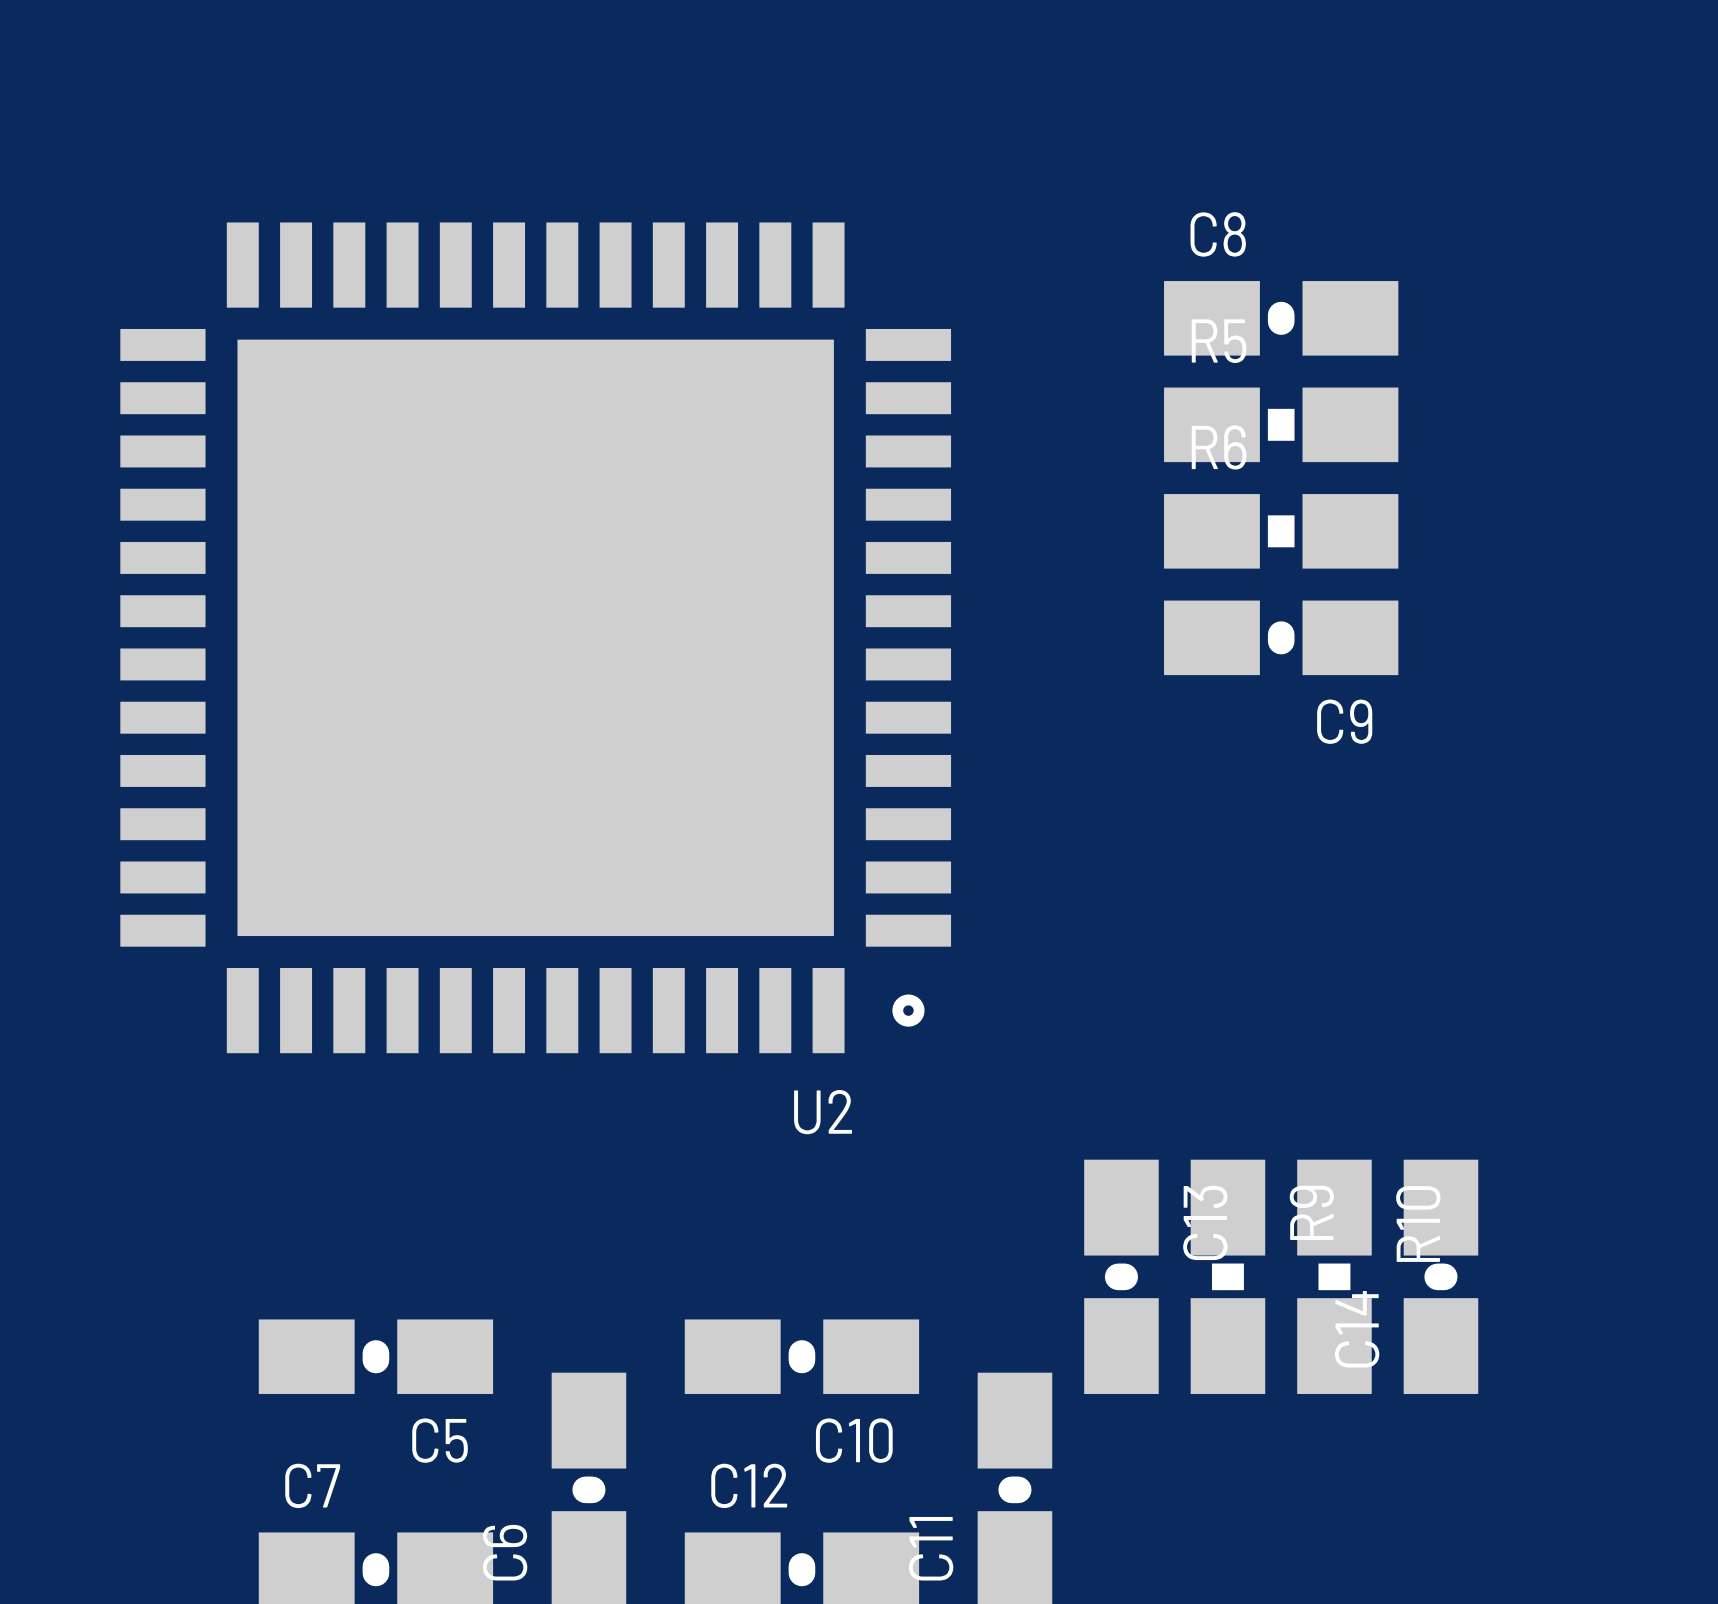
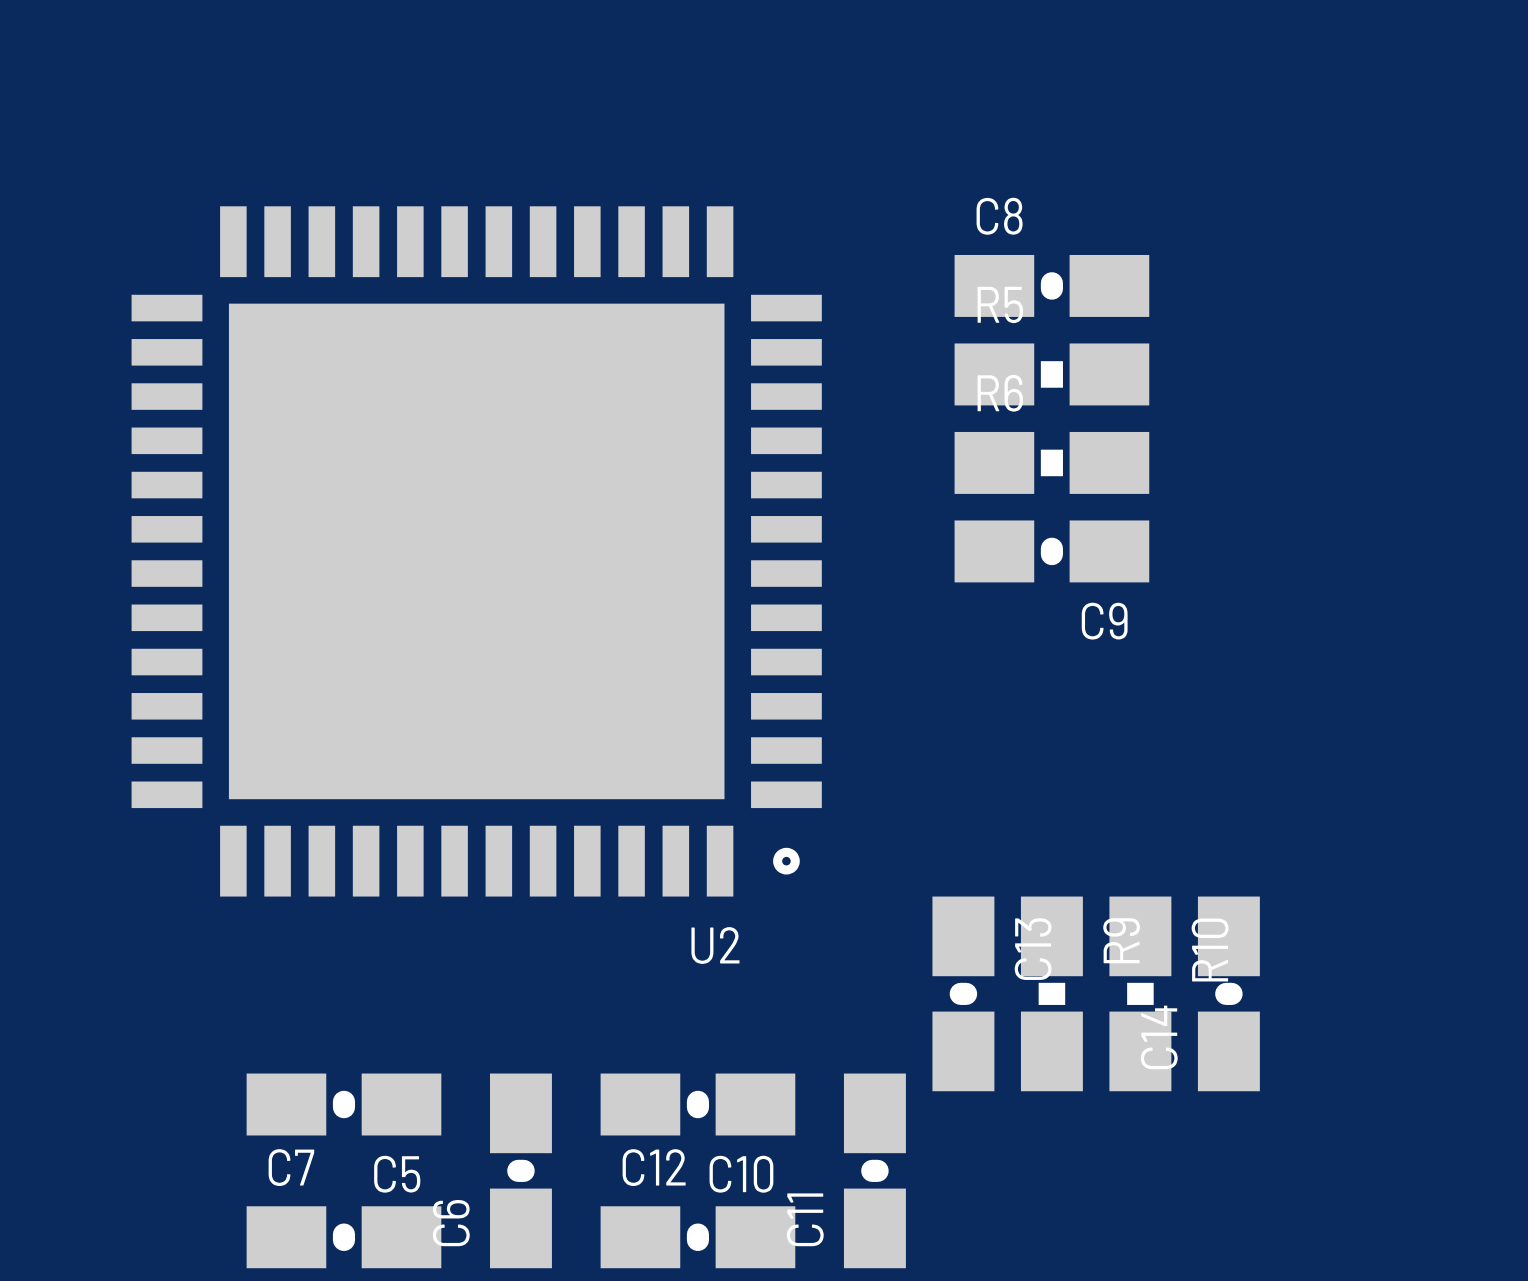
C8 position: (1281, 318) -> (1051, 285)
part position: (1281, 424) -> (1051, 374)
part position: (1281, 531) -> (1051, 462)
U2 position: (535, 637) -> (476, 551)
C9 position: (1281, 637) -> (1051, 551)
C5 position: (375, 1356) -> (343, 1104)
C10 position: (801, 1356) -> (697, 1104)

